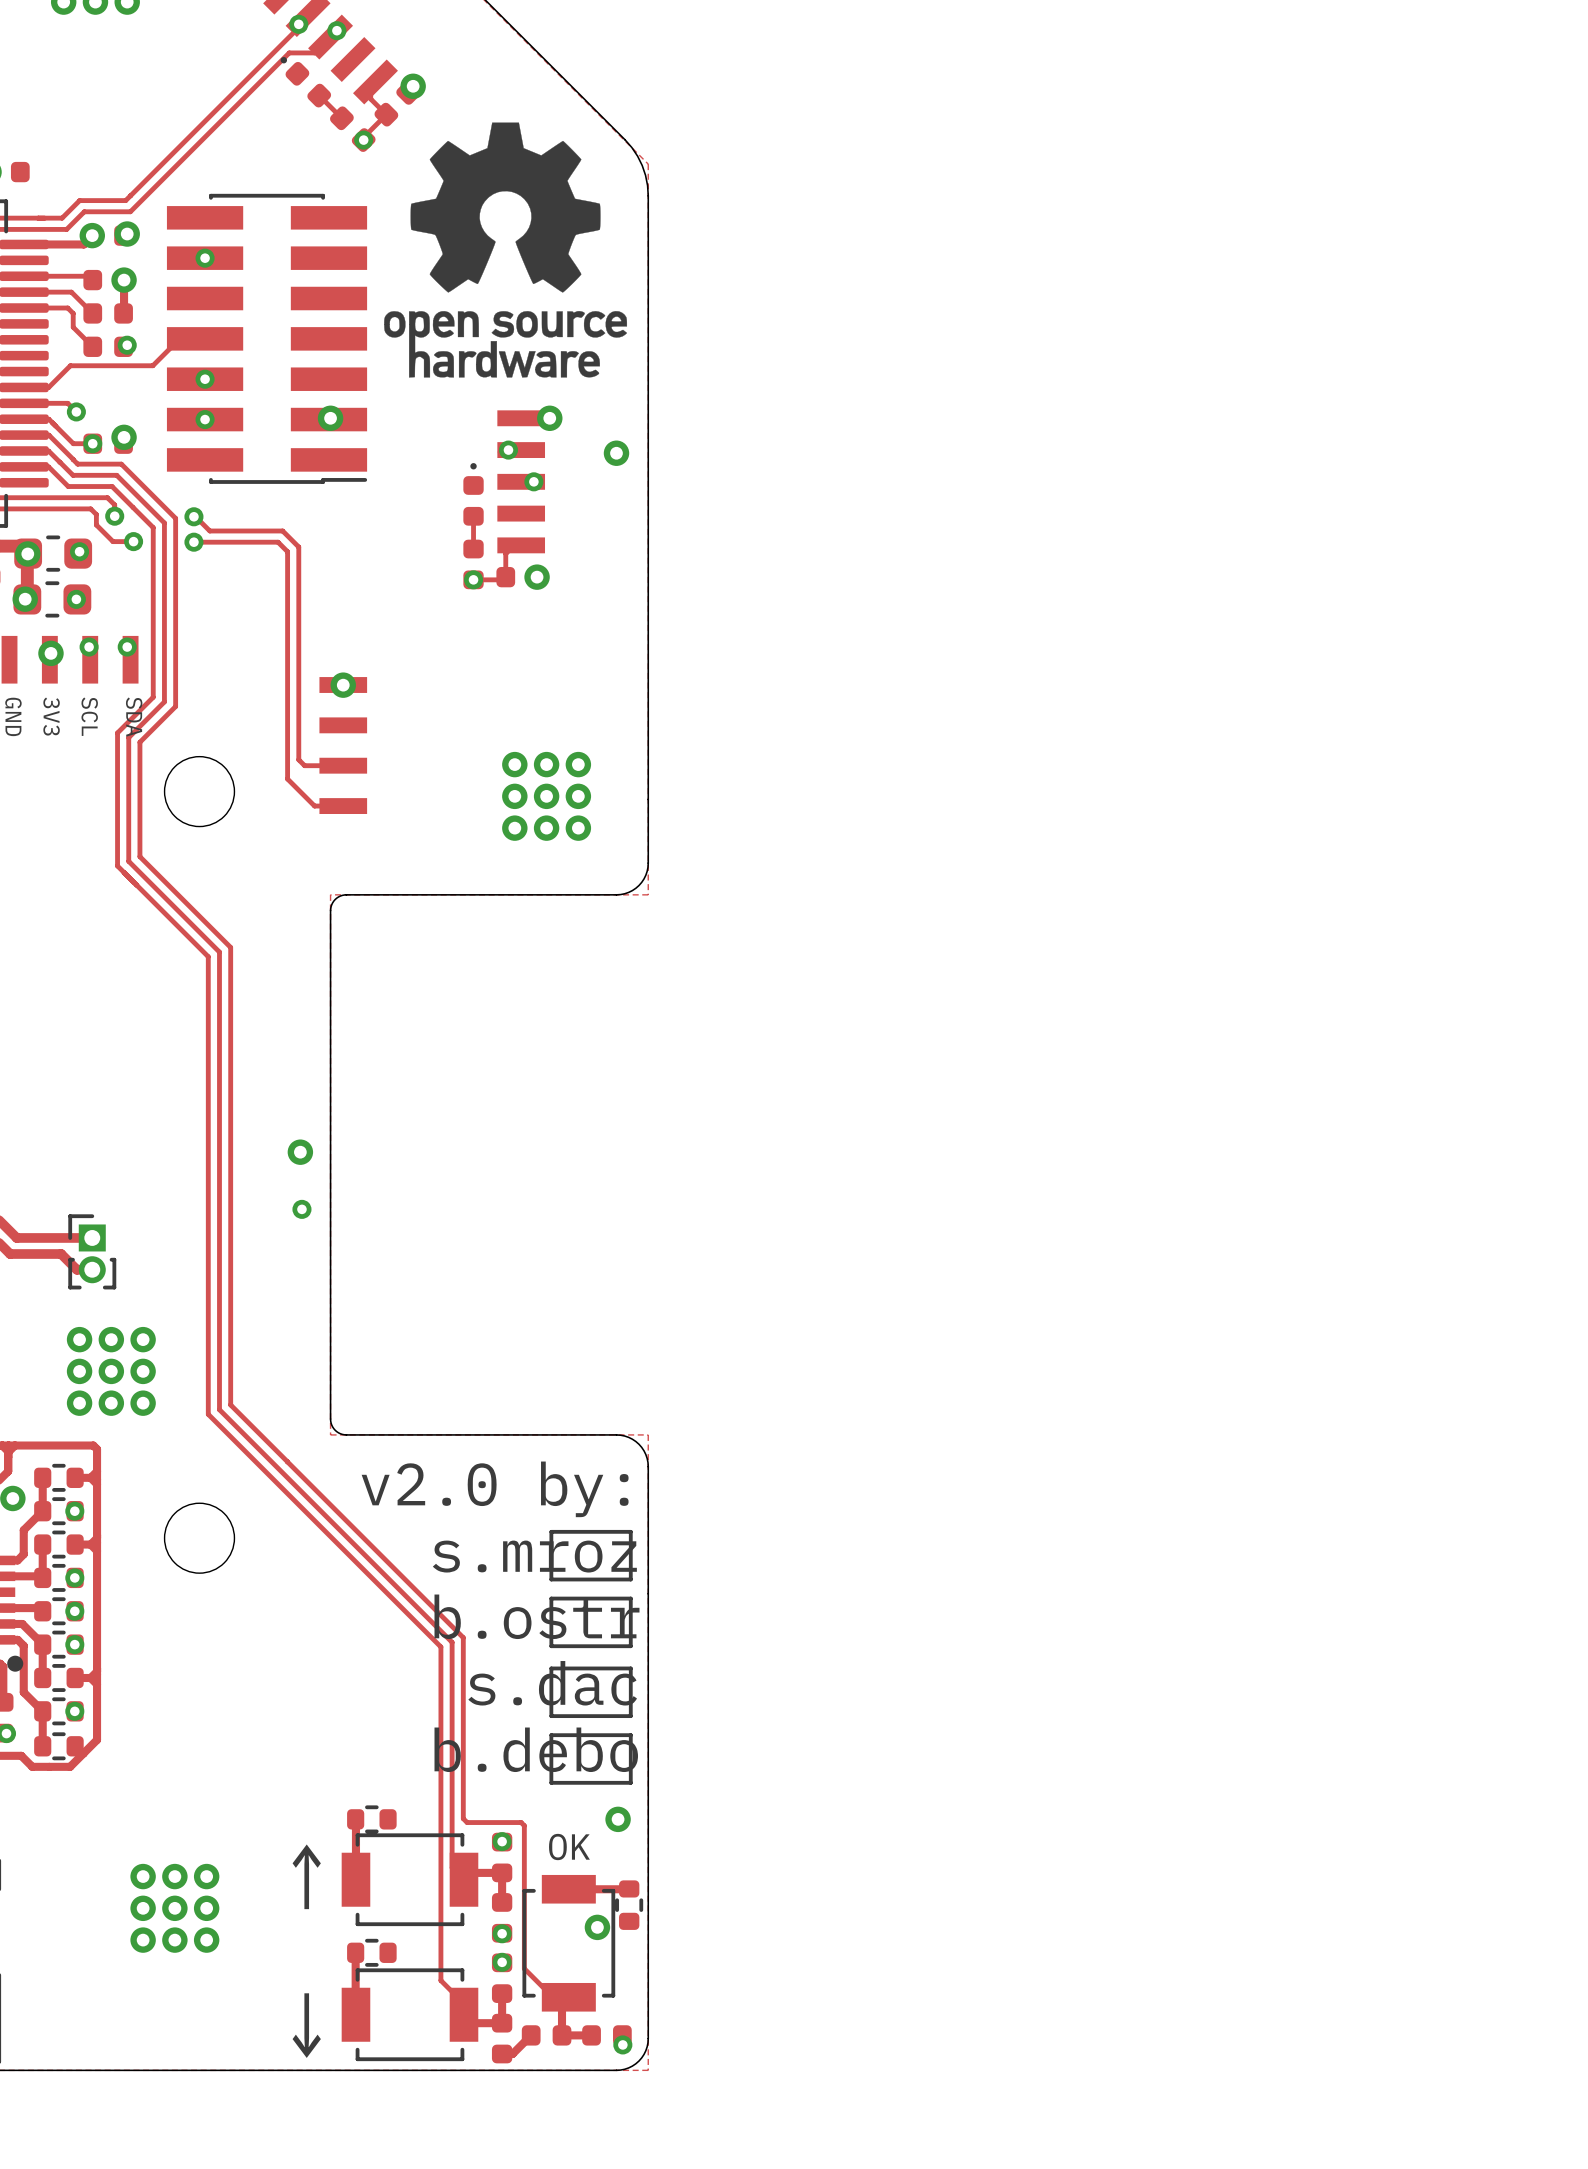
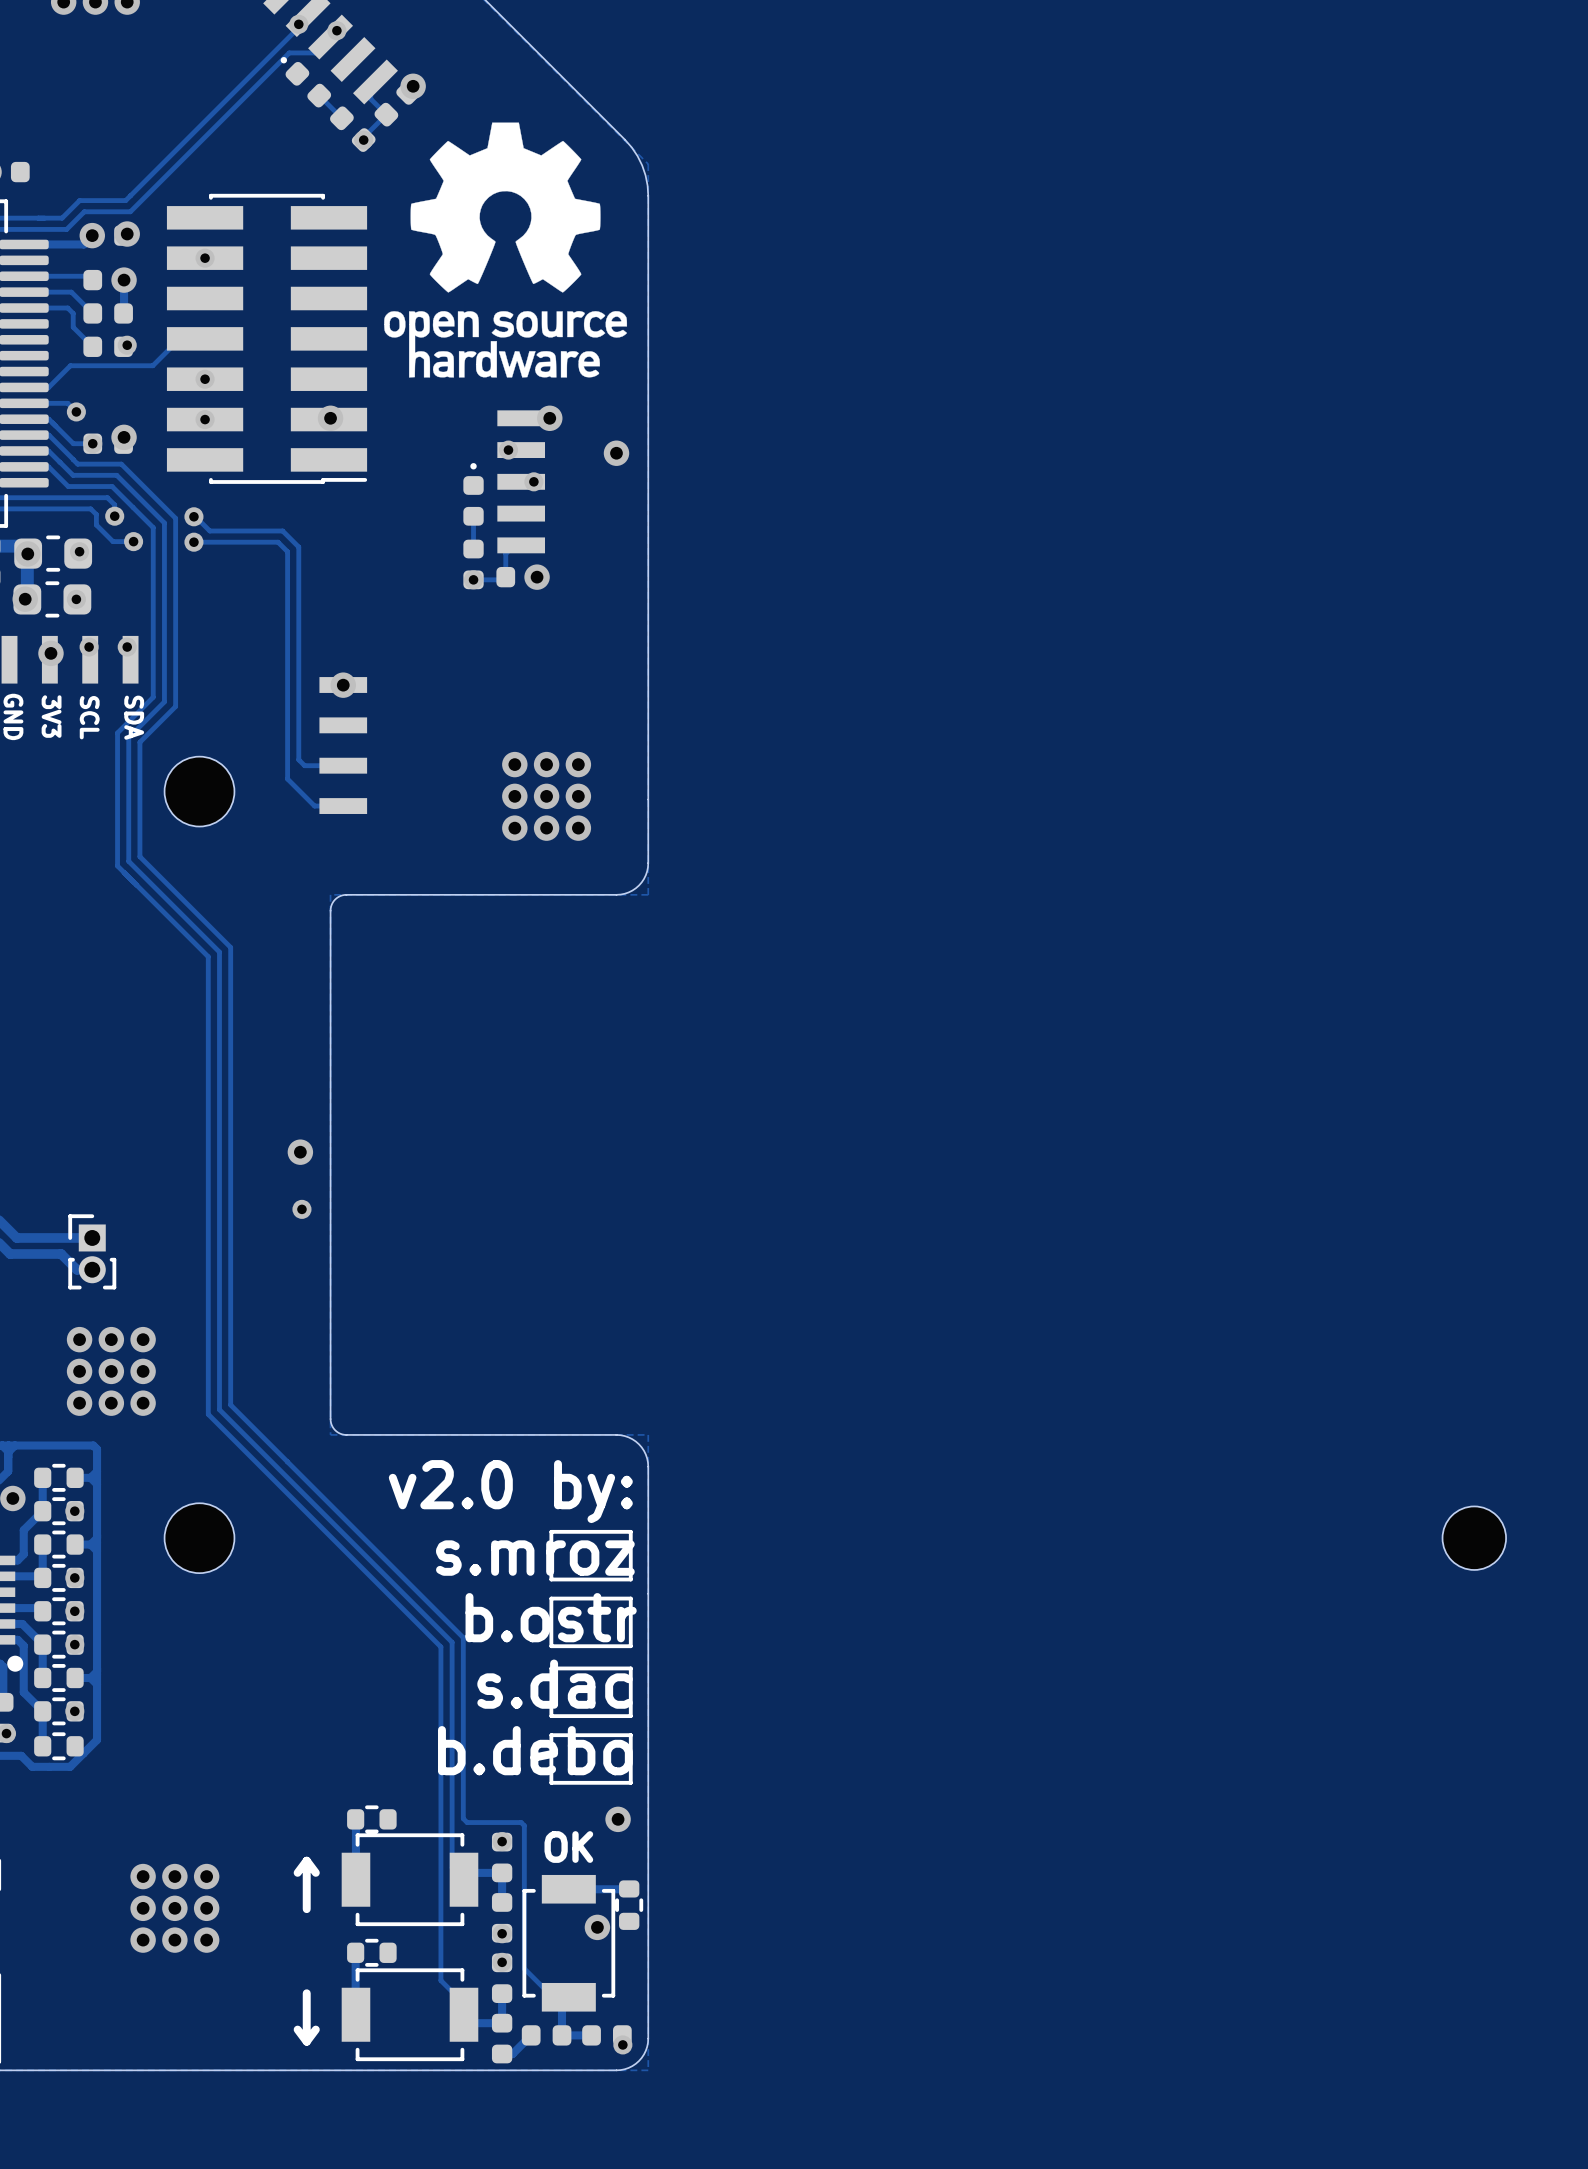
part: none -> (1474, 1538)

